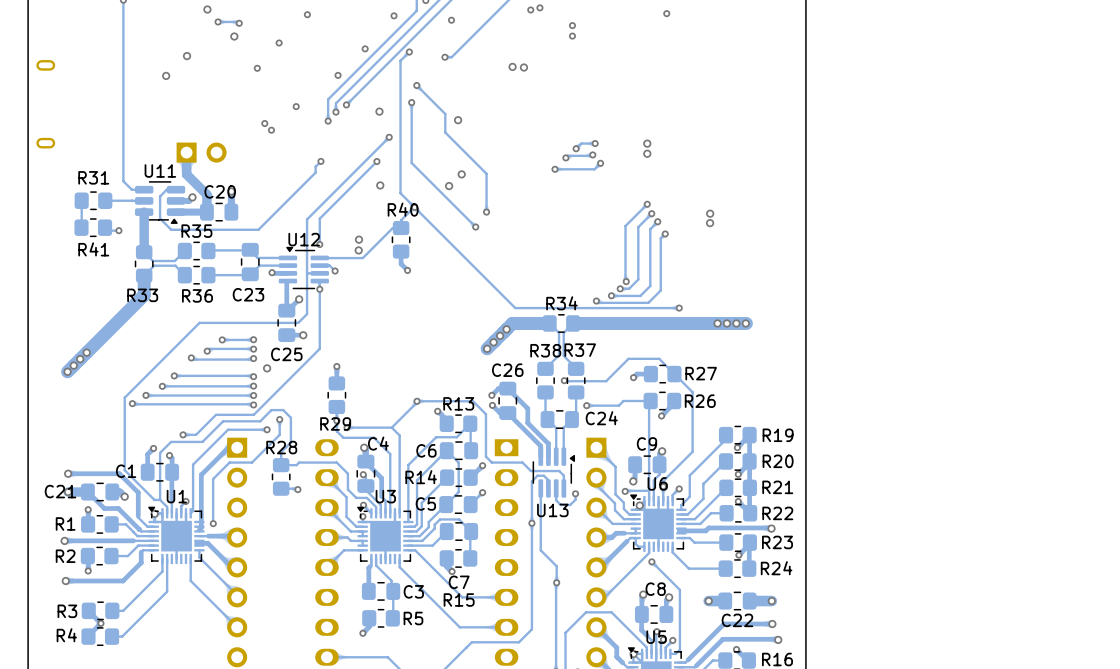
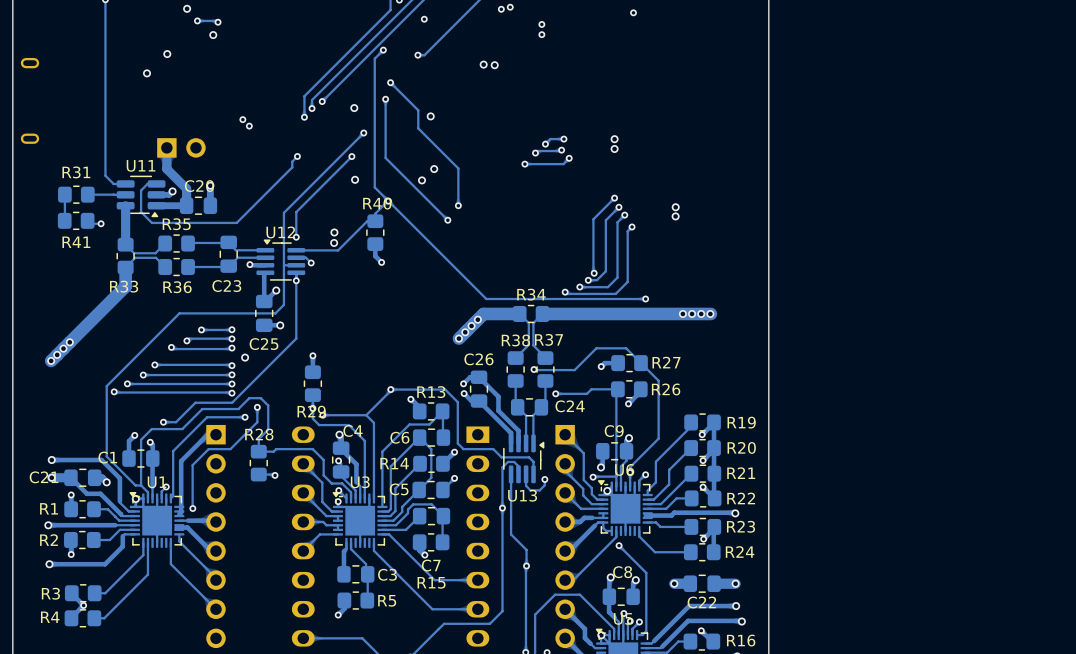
via: (307, 14) -> none
via: (394, 15) -> none
via: (279, 42) -> none
via: (365, 48) -> none
via: (257, 68) -> none
via: (338, 75) -> none
via: (296, 106) -> none

